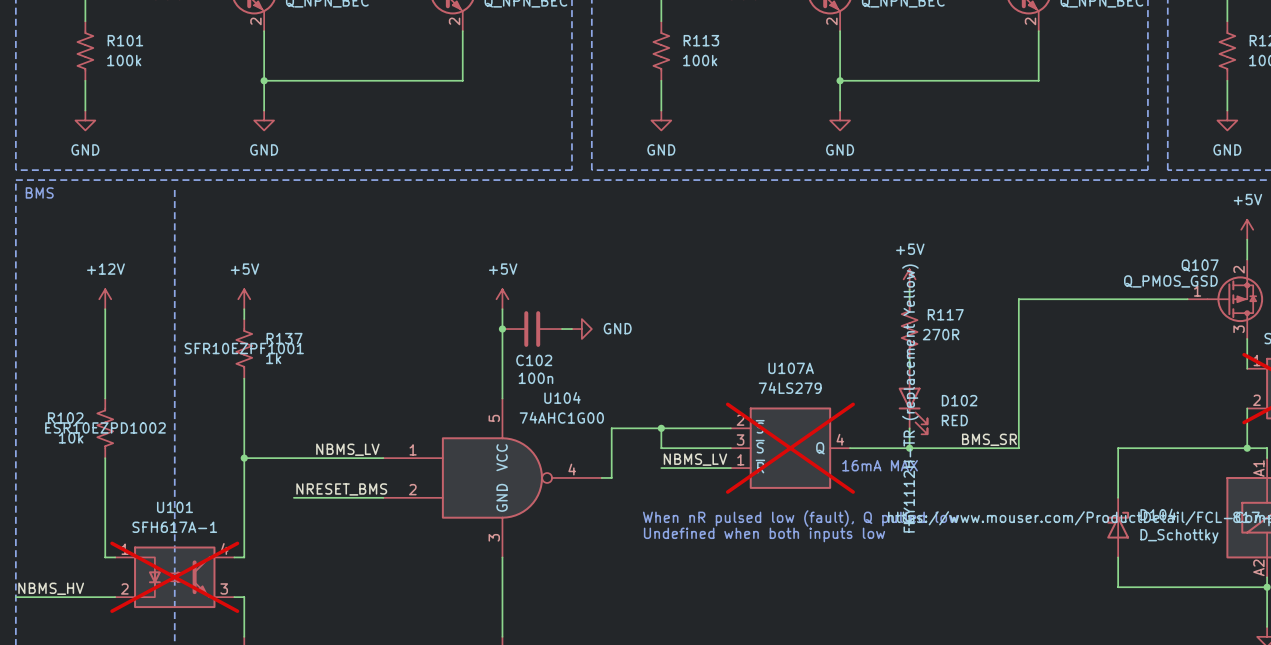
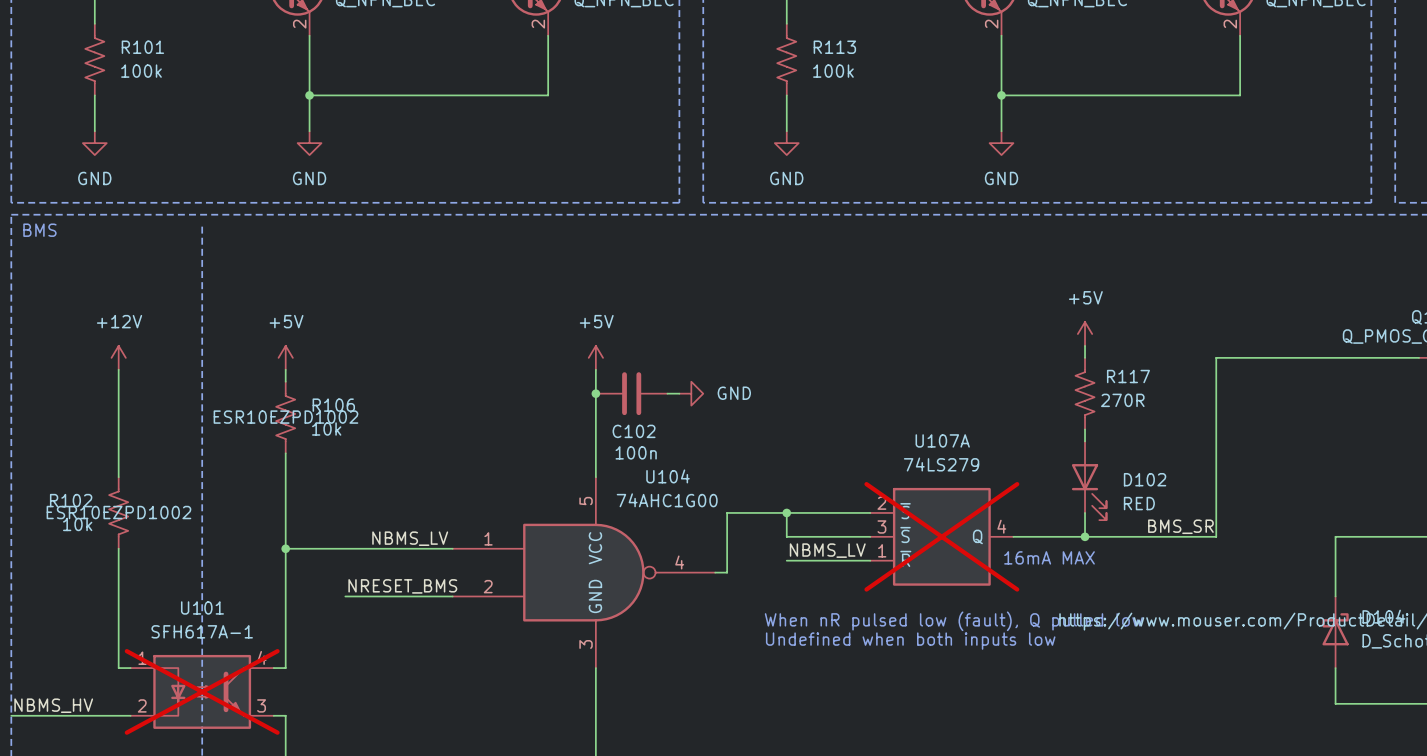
R137 name: R137 (284, 338) -> R106 (333, 405)
R137 text: SFR10EZPF1001 (244, 348) -> ESR10EZPD1002 (285, 417)
R137 value: 1k (273, 358) -> 10k (326, 429)
D102 text: FKY1112H-TR (replacement Yellow) (910, 398) -> none

